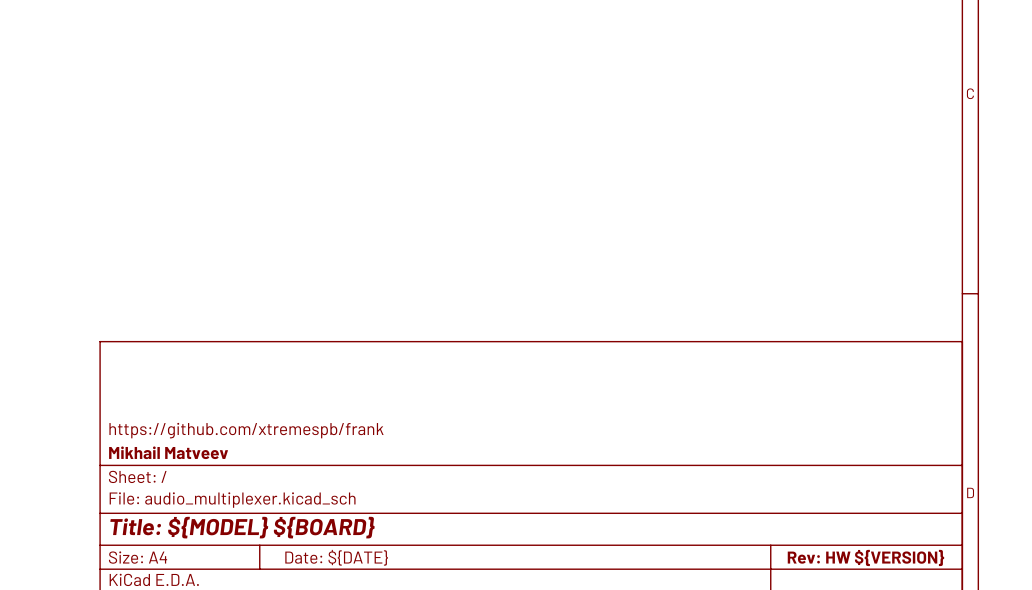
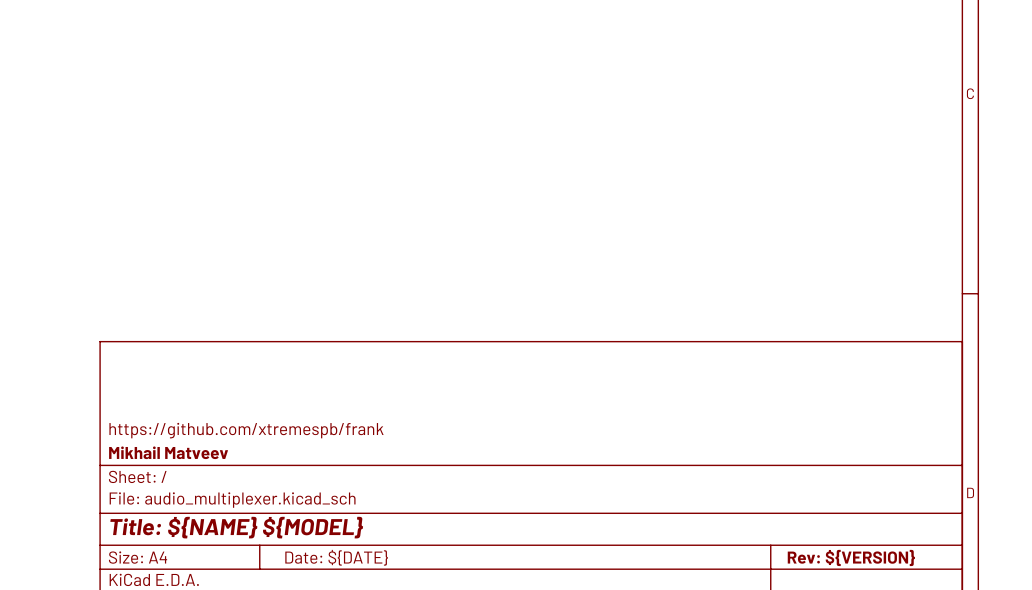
title block: Title: ${MODEL} ${BOARD} (242, 527) -> Title: ${NAME} ${MODEL} (236, 527)
title block: Rev: HW ${VERSION} (865, 557) -> Rev: ${VERSION} (851, 557)

